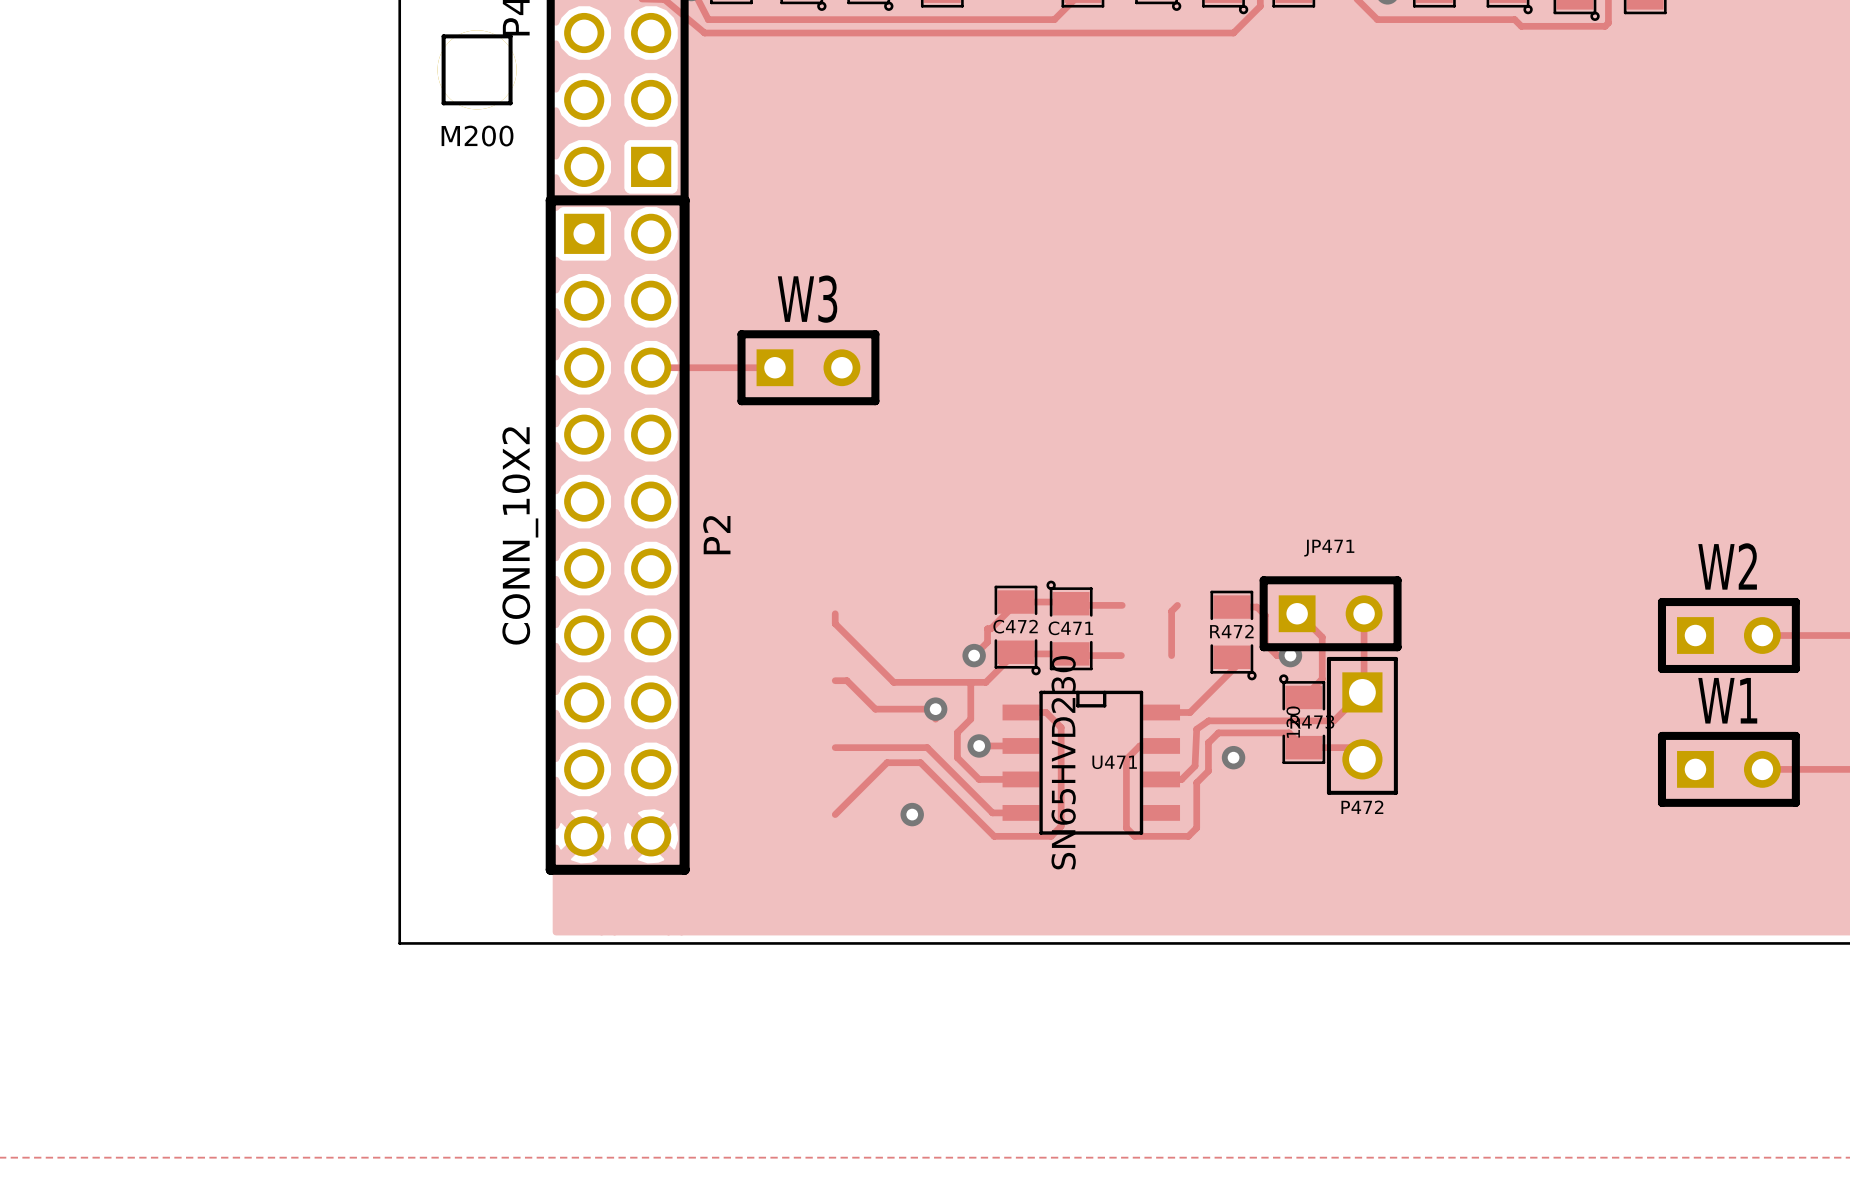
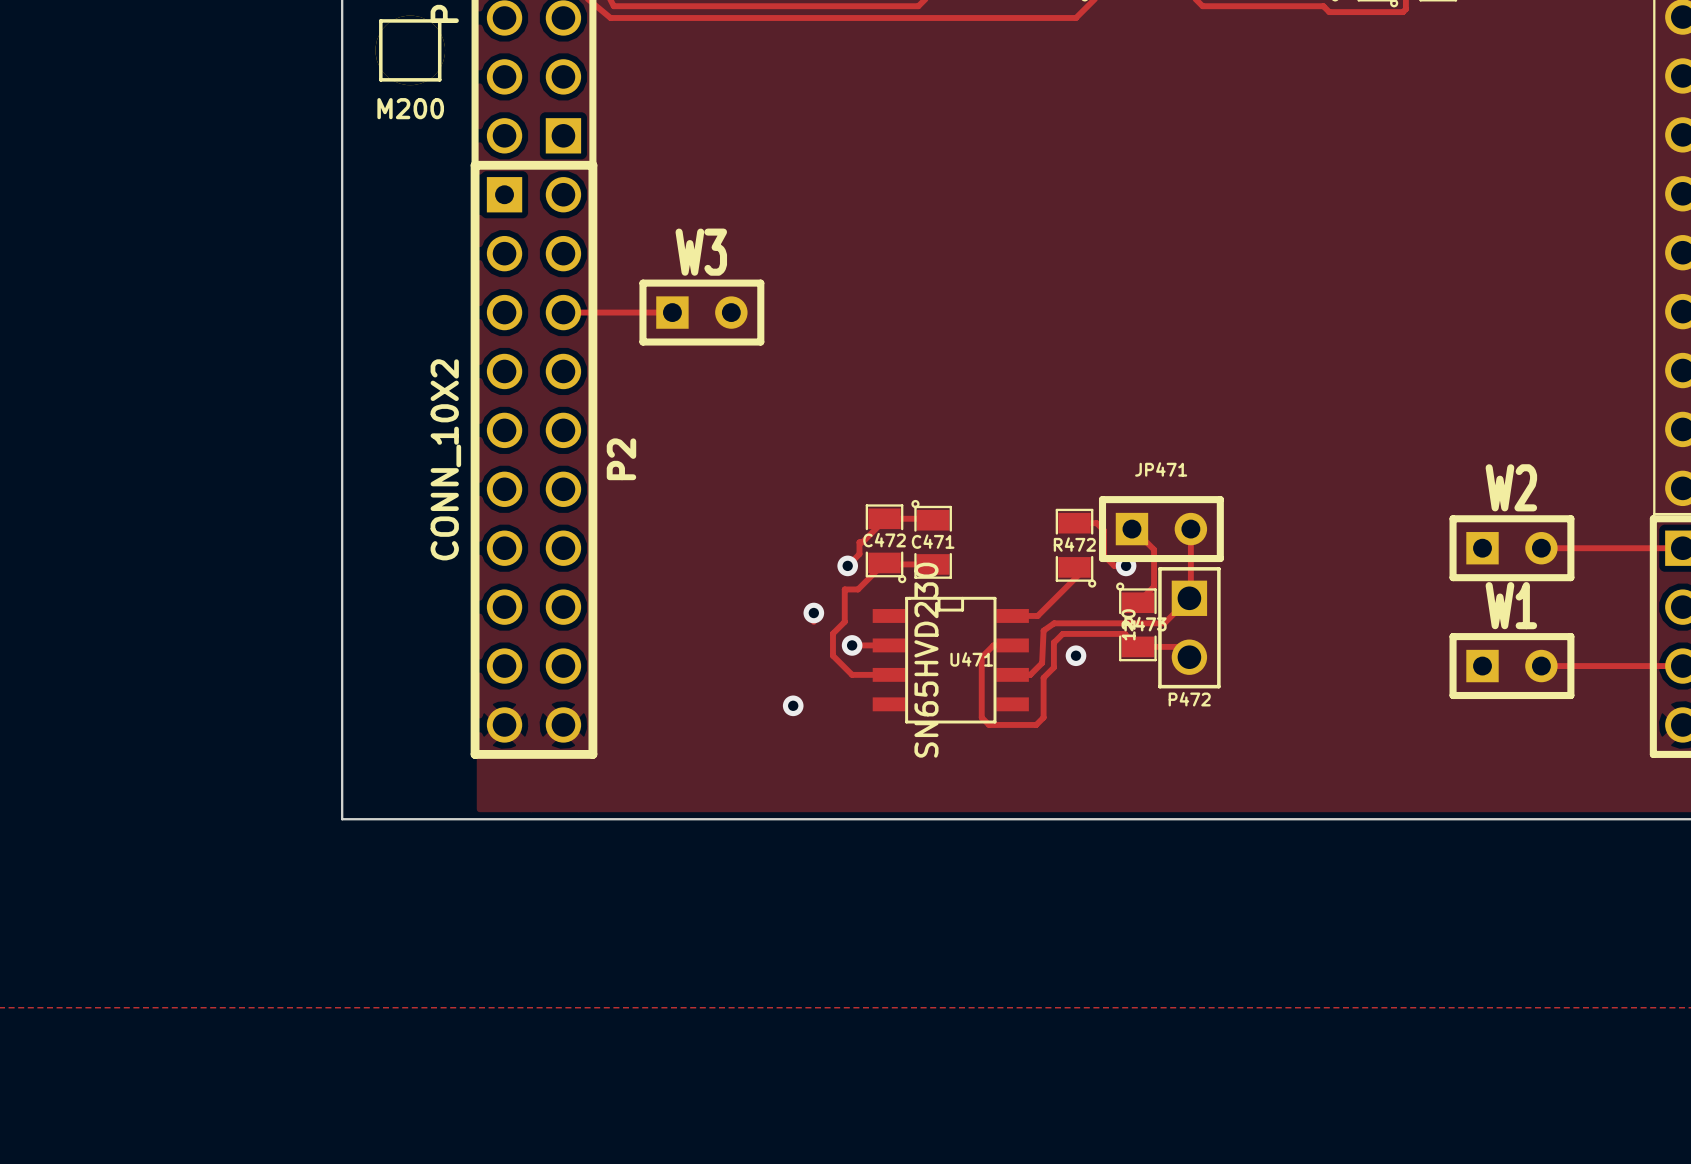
track: (1071, 605) (1122, 605) -> none
track: (1177, 605) (1171, 611) (1171, 655) -> none
track: (835, 613) (835, 623) (893, 682) (970, 682) -> none
track: (1072, 655) (1121, 655) -> none
track: (835, 680) (846, 680) (875, 709) (935, 709) -> none
track: (1021, 712) (1046, 712) (1061, 727) (1061, 826) (1051, 836) (994, 836) (920, 762) (887, 762) (835, 814) -> none
track: (835, 747) (927, 747) (992, 812) (1021, 812) -> none

